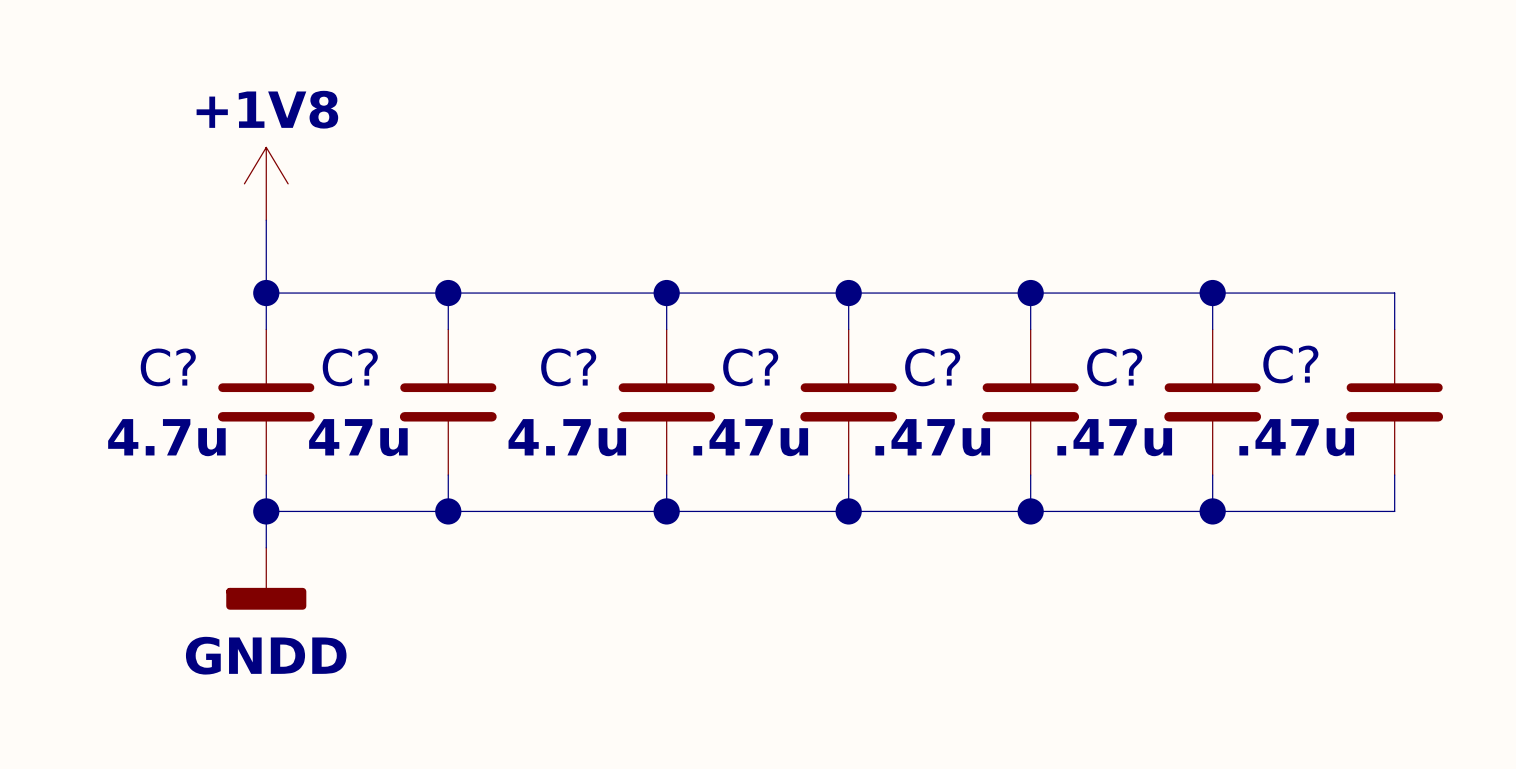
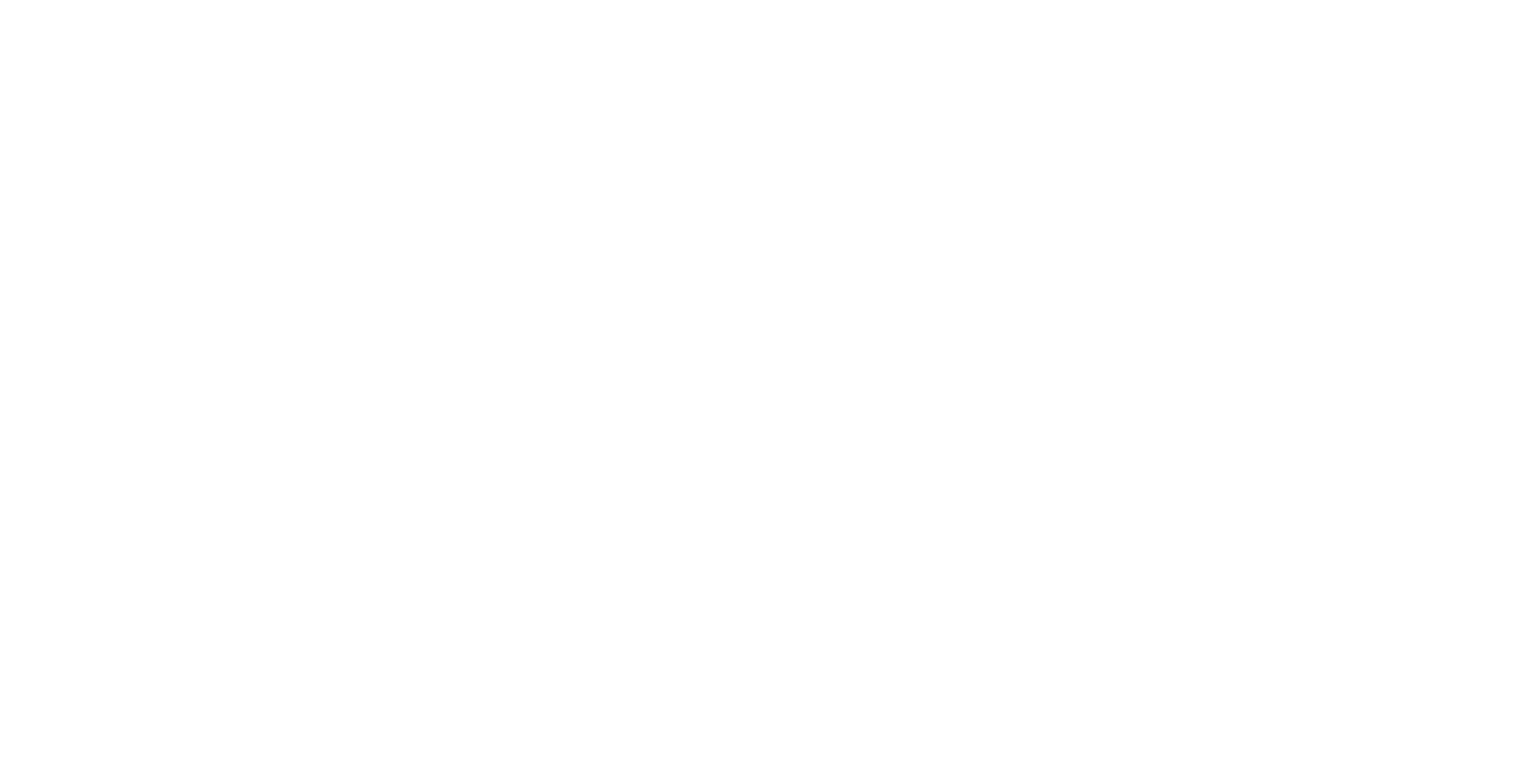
power symbol: +1V8 (266, 183) -> none
wire: (266, 220) (266, 329) -> none
wire: (266, 293) (1394, 293) (1394, 329) -> none
junction: (266, 293) -> none
wire: (448, 293) (448, 329) -> none
junction: (448, 293) -> none
wire: (666, 293) (666, 329) -> none
junction: (666, 293) -> none
wire: (848, 293) (848, 329) -> none
junction: (848, 293) -> none
wire: (1030, 293) (1030, 329) -> none
junction: (1030, 293) -> none
wire: (1212, 293) (1212, 329) -> none
junction: (1212, 293) -> none
C?: 4.7u (266, 402) -> none
C?: 47u (448, 402) -> none
C?: 4.7u (666, 402) -> none
C?: .47u (848, 402) -> none
C?: .47u (1030, 402) -> none
C?: .47u (1212, 402) -> none
C?: .47u (1394, 402) -> none
wire: (266, 475) (266, 547) -> none
wire: (448, 475) (448, 511) -> none
wire: (666, 475) (666, 511) -> none
wire: (848, 475) (848, 511) -> none
wire: (1030, 475) (1030, 511) -> none
wire: (1212, 475) (1212, 511) -> none
wire: (1394, 475) (1394, 511) (266, 511) -> none
junction: (266, 511) -> none
junction: (448, 511) -> none
junction: (666, 511) -> none
junction: (848, 511) -> none
junction: (1030, 511) -> none
junction: (1212, 511) -> none
power symbol: GNDD (266, 578) -> none

